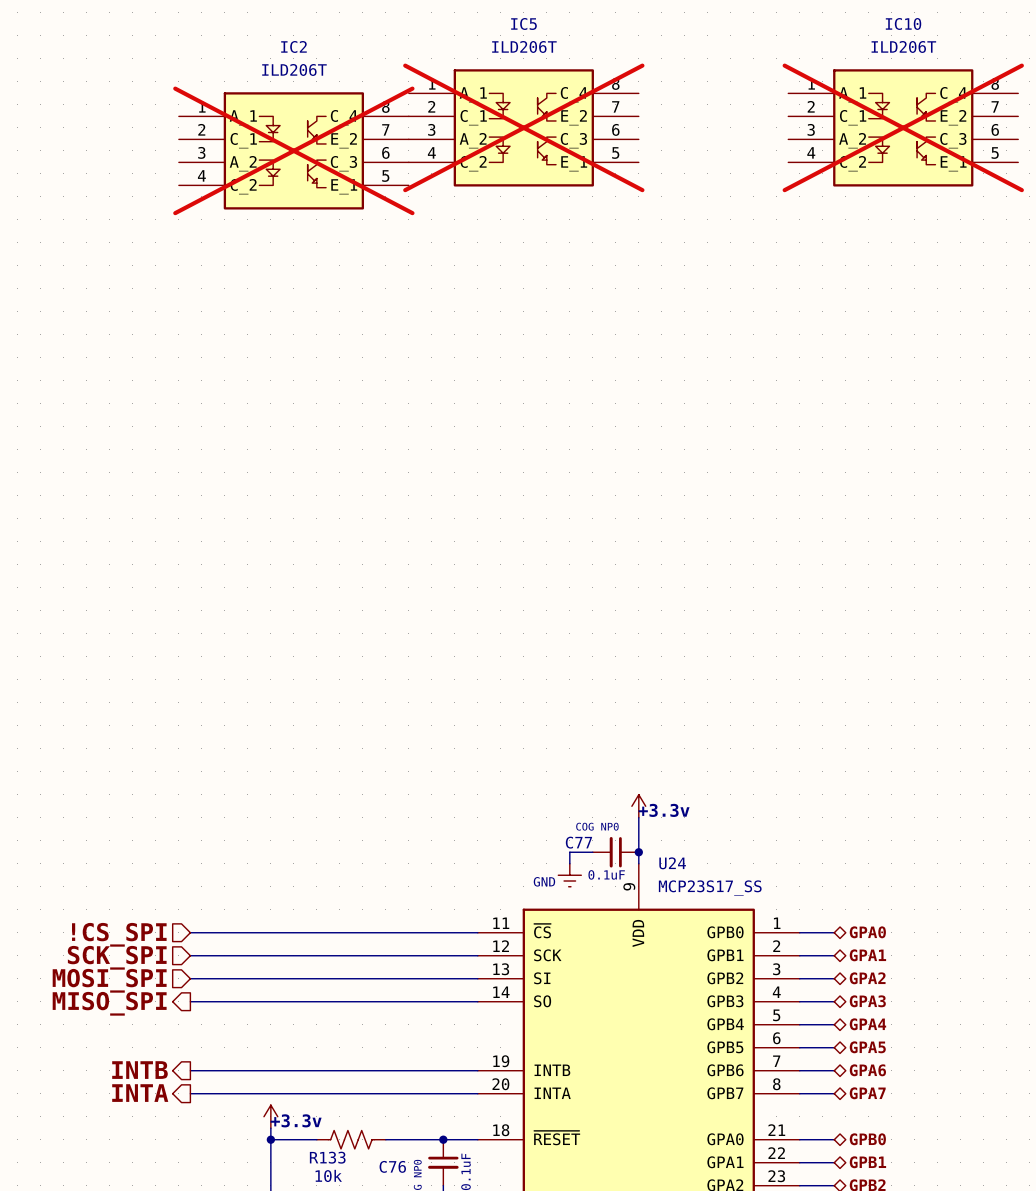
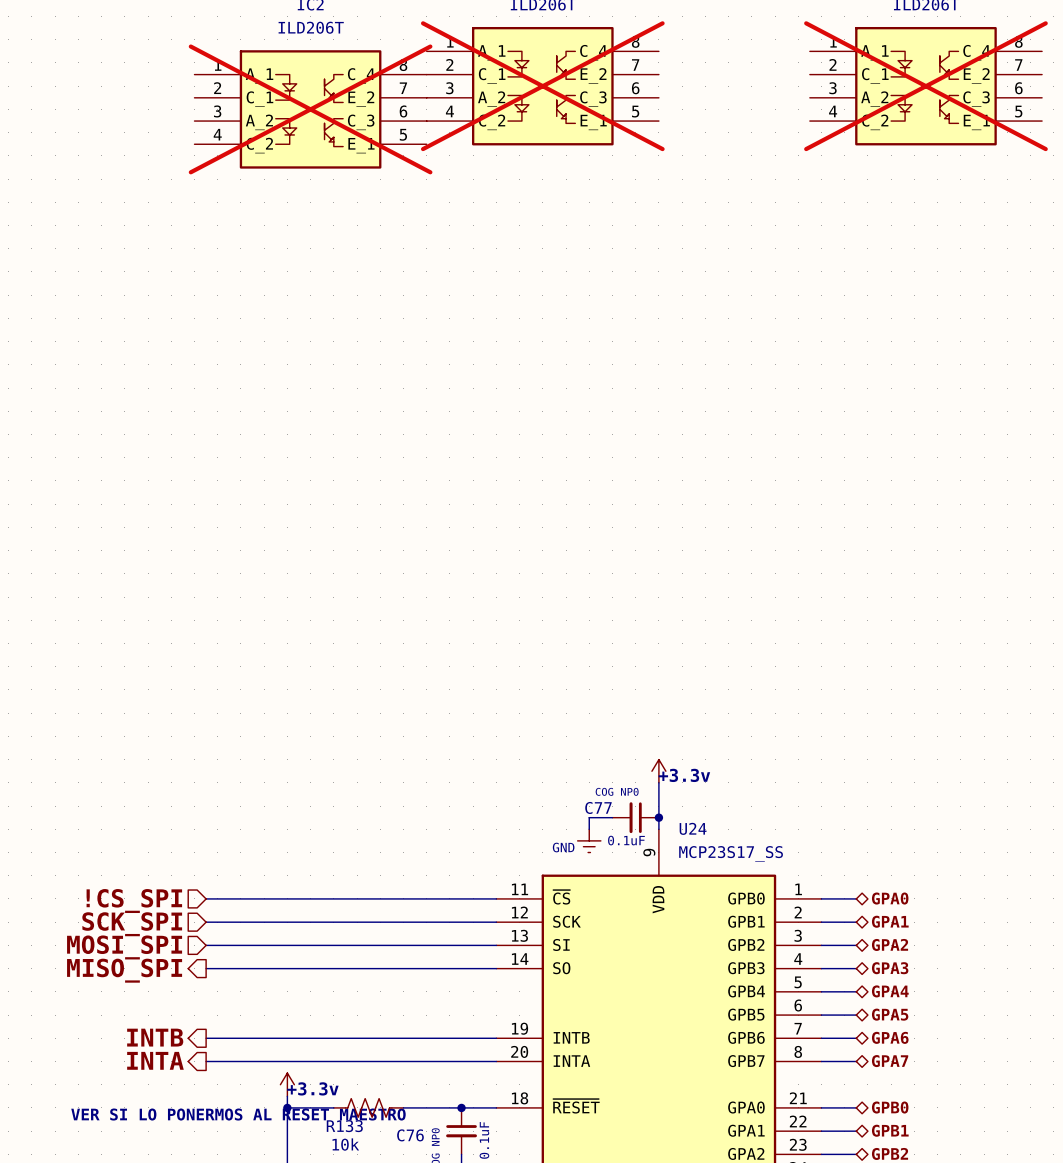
text: none -> VER SI LO PONERMOS AL RESET MAESTRO (238, 1114)

